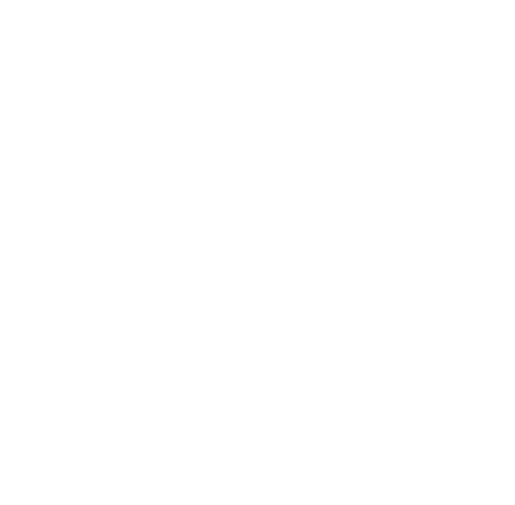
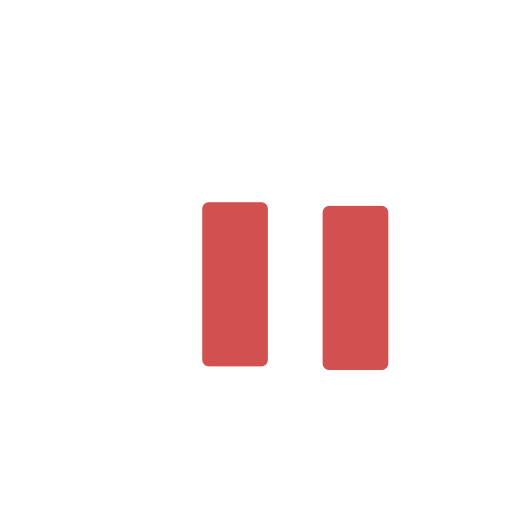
part: none -> (295, 286)

